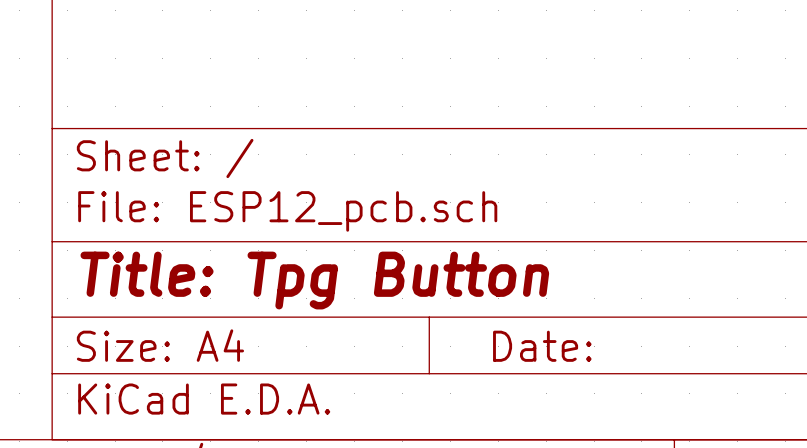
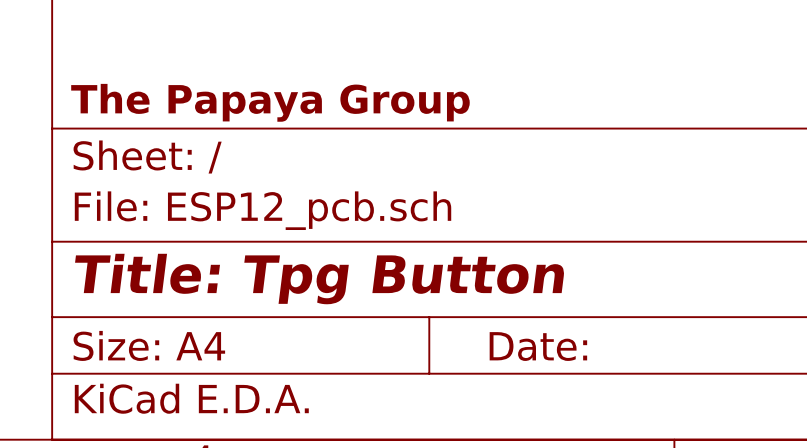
title block: none -> The Papaya Group (270, 102)

